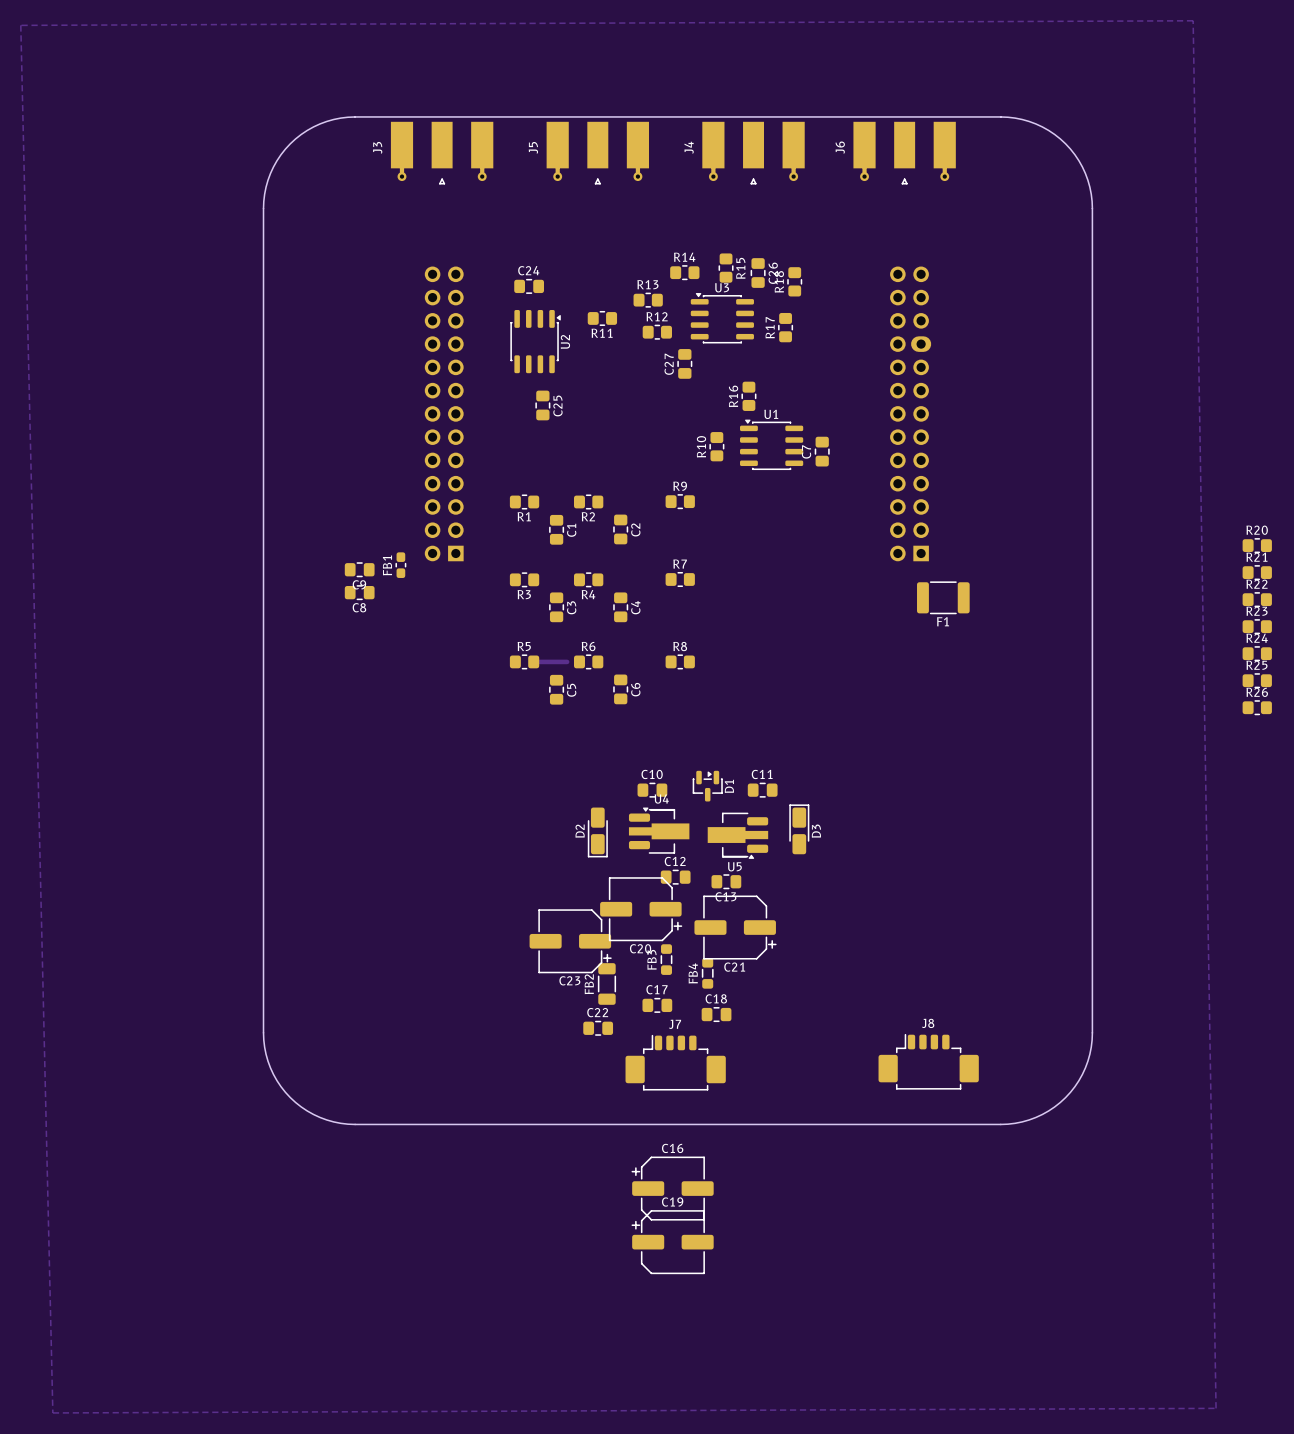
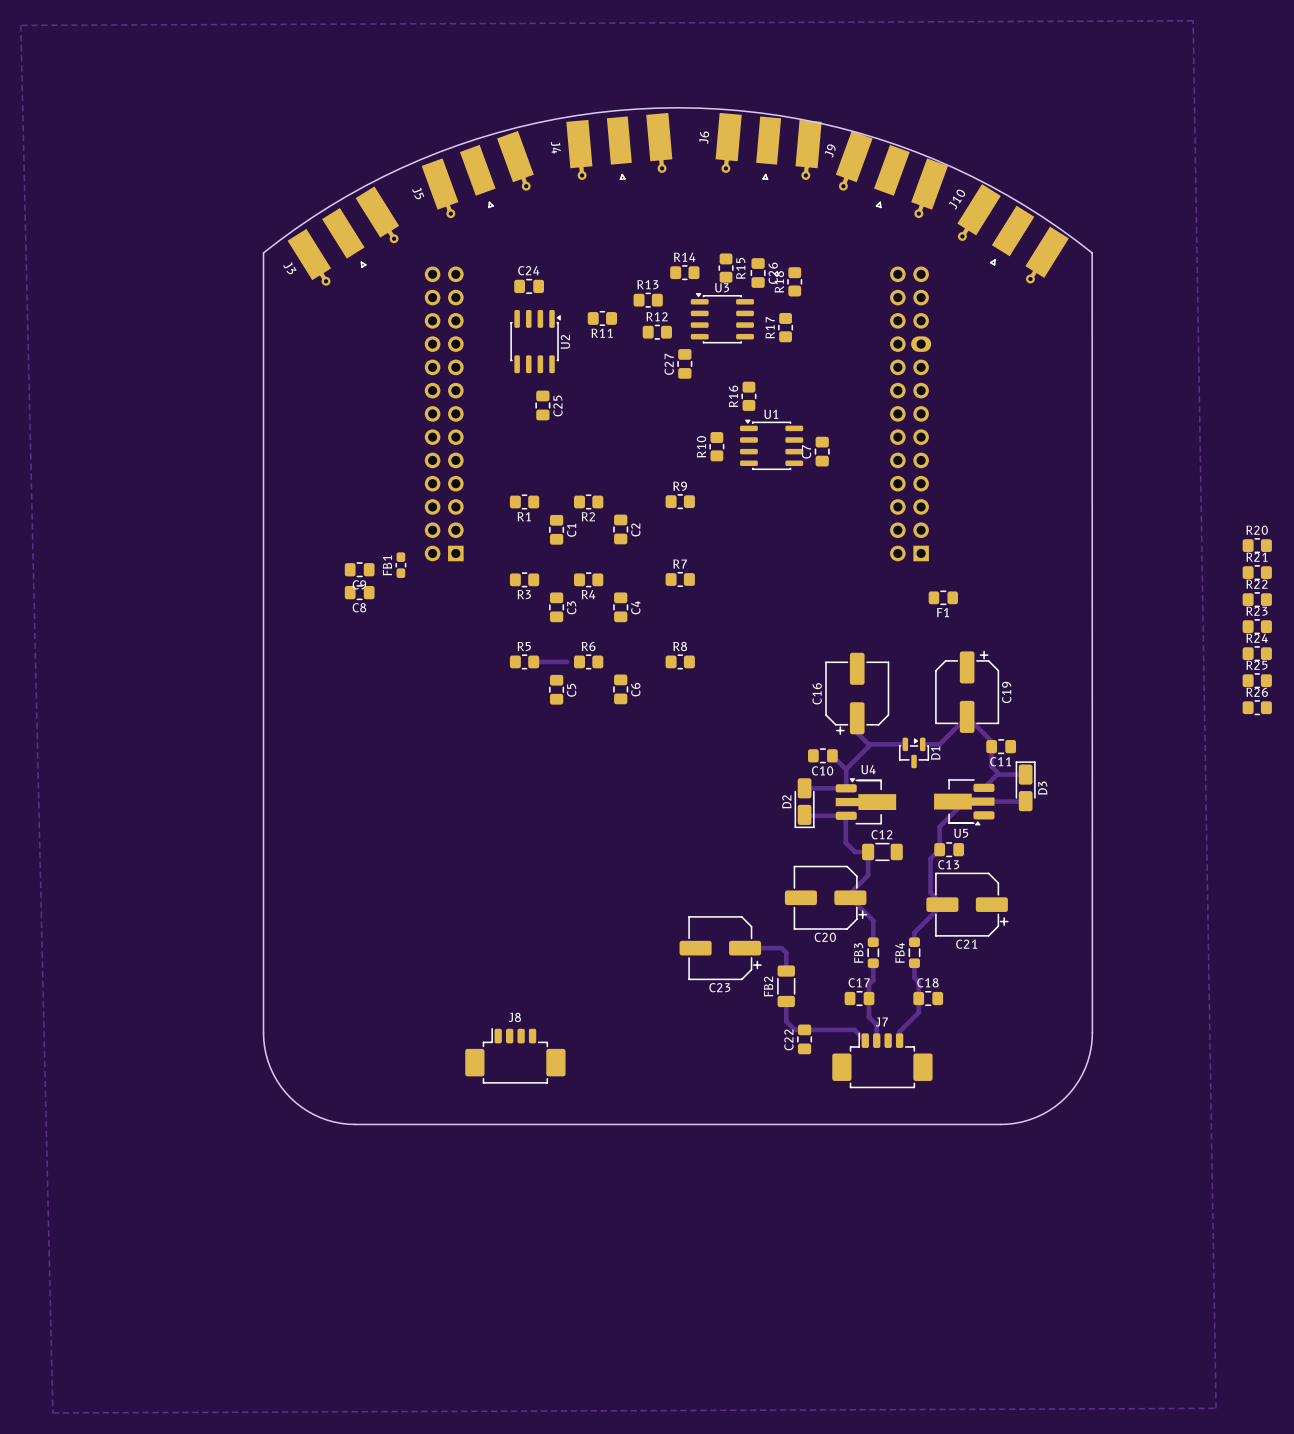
J3 rotation: 0° (442, 153) -> 32° counterclockwise (343, 236)
J3 position: (442, 153) -> (343, 236)
J5 rotation: 0° (597, 153) -> 20° counterclockwise (477, 174)
J5 position: (597, 153) -> (477, 174)
J4 rotation: 0° (753, 153) -> 5° counterclockwise (619, 146)
J4 position: (753, 153) -> (619, 146)
J6 rotation: 0° (904, 153) -> 5° clockwise (768, 146)
J6 position: (904, 153) -> (768, 146)
J9: none -> (891, 174)
J10: none -> (1013, 233)
board edge: (263, 252) (264, 194) (267, 180) (277, 160) (290, 143) (307, 130) (326, 121) (340, 118) (1000, 116) (1015, 118) (1035, 123) (1054, 134) (1065, 143) (1078, 160) (1085, 173) (1091, 194) (1092, 208) (1092, 1032) -> (263, 252) (312, 217) (347, 195) (401, 167) (458, 145) (516, 127) (576, 115) (616, 110) (677, 107) (738, 110) (799, 118) (858, 132) (897, 145) (935, 159) (990, 185) (1042, 217) (1092, 252) (1092, 1032)
F1 footprint: [917, 581, 970, 615] -> [928, 590, 958, 605]
track: none -> (857, 718) (857, 732) (868, 744) (905, 744)
track: none -> (870, 744) (846, 769) (846, 788) (804, 788)
track: none -> (922, 744) (939, 744) (967, 716) (991, 741) (991, 766) (997, 774)
track: none -> (832, 755) (846, 769)
C10 name position: C10 (652, 774) -> C10 (822, 770)
C11 name position: C11 (762, 774) -> C11 (1000, 761)
track: none -> (997, 774) (983, 787)
track: none -> (997, 774) (1025, 774)
D1 position: (707, 786) -> (914, 752)
C10 position: (652, 790) -> (822, 755)
C11 position: (762, 790) -> (1001, 746)
track: none -> (1025, 801) (964, 801) (939, 826) (939, 849) (930, 858) (930, 892) (942, 904) (914, 932) (914, 942)
track: none -> (804, 814) (846, 815) (845, 842) (854, 851) (868, 851) (868, 875) (850, 893) (850, 897) (873, 920) (873, 942)
D3 position: (799, 829) -> (1025, 786)
U4 position: (659, 830) -> (865, 801)
D2 position: (597, 832) -> (804, 803)
U5 position: (737, 835) -> (964, 802)
C12 footprint: [660, 869, 691, 885] -> [862, 843, 903, 861]
C20 footprint: [600, 877, 683, 942] -> [784, 865, 867, 930]
C13 position: (726, 881) -> (949, 849)
C21 position: (735, 927) -> (967, 904)
C23 position: (570, 941) -> (720, 948)
track: none -> (745, 948) (781, 948) (786, 952) (786, 971)
FB3 position: (666, 959) -> (873, 952)
track: none -> (873, 963) (873, 980) (869, 984) (868, 1016) (876, 1024) (876, 1040)
track: none -> (914, 963) (914, 977) (918, 982) (919, 1012) (899, 1031) (899, 1040)
FB4 position: (707, 973) -> (914, 952)
FB2 position: (606, 983) -> (786, 986)
track: none -> (786, 1001) (786, 1021) (794, 1029) (854, 1029) (865, 1040)
C17 position: (657, 1005) -> (859, 998)
C22 name position: C22 (597, 1012) -> C22 (788, 1039)
C18 position: (716, 1014) -> (928, 998)
C22 rotation: 0° (598, 1028) -> 90° clockwise (804, 1039)
C22 position: (598, 1028) -> (804, 1039)
J8 position: (928, 1061) -> (515, 1055)
J7 position: (675, 1062) -> (882, 1060)
C16 name position: C16 (672, 1148) -> C16 (817, 693)
C16 footprint: [631, 1156, 714, 1221] -> [825, 652, 890, 735]
C19 rotation: 0° (672, 1242) -> 90° clockwise (967, 691)
C19 position: (672, 1242) -> (967, 691)

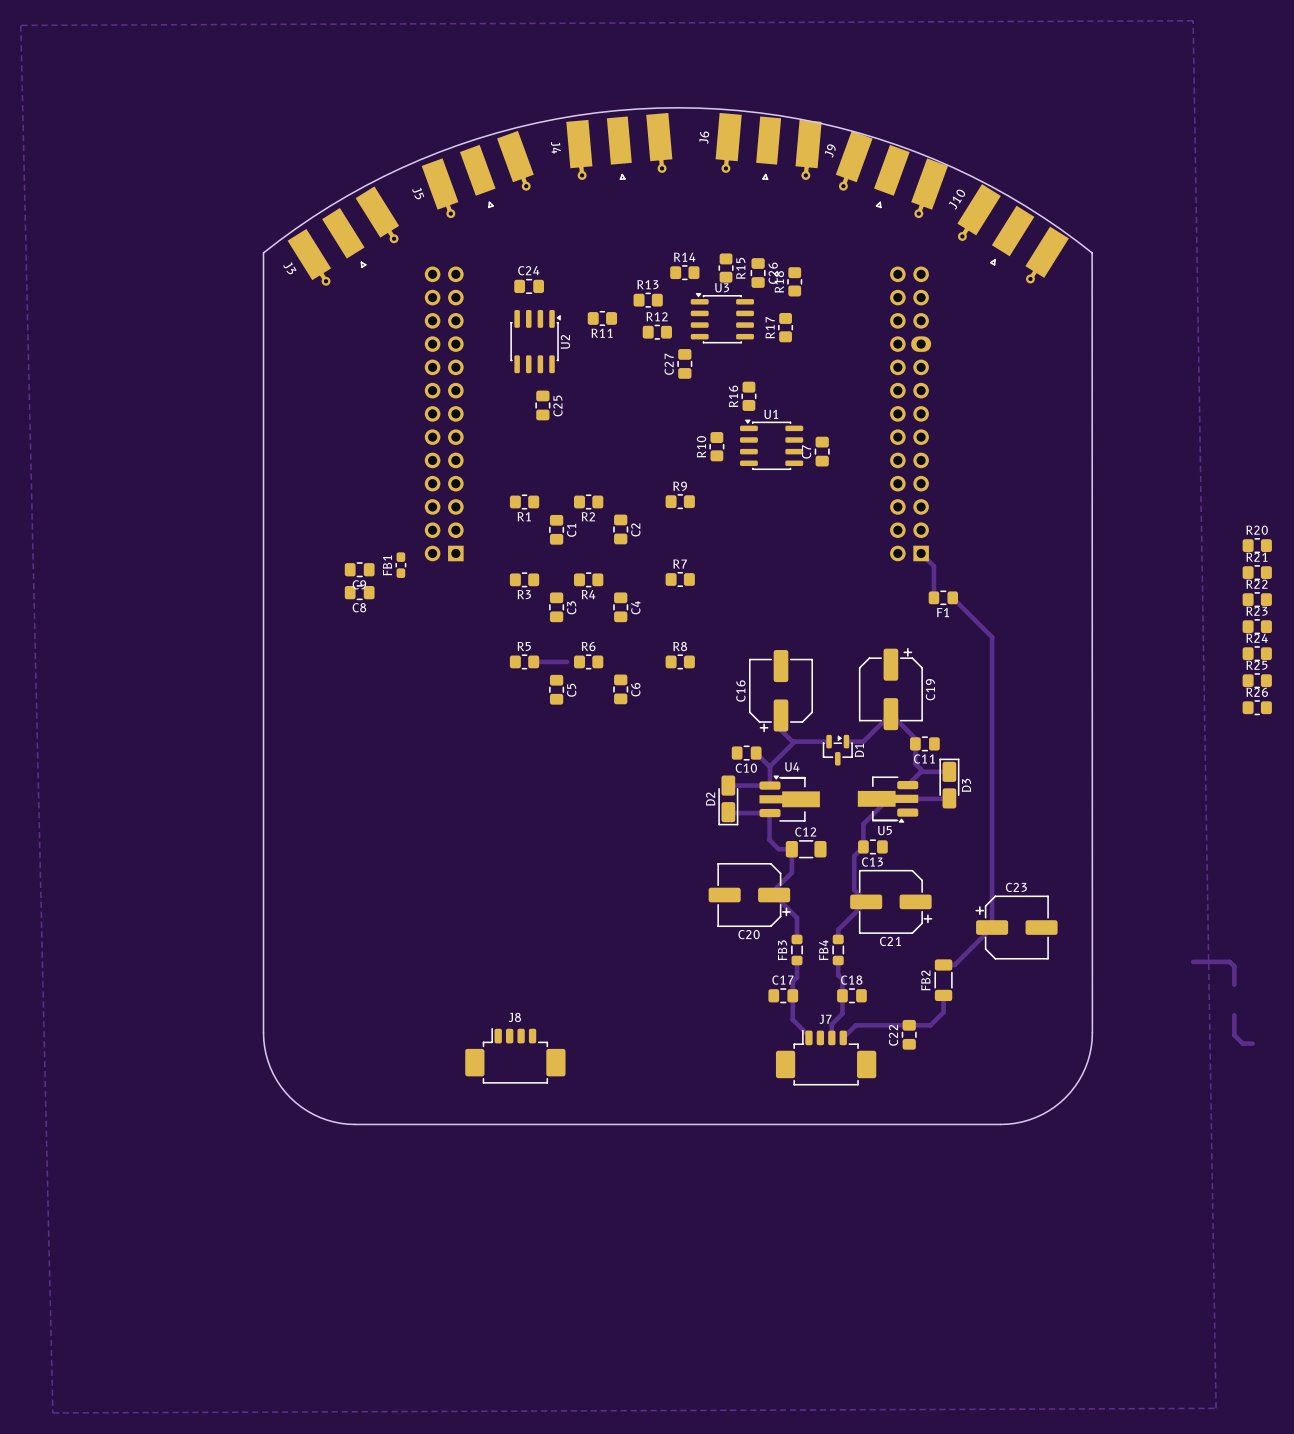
track: none -> (921, 553) (933, 566) (933, 597)
track: none -> (952, 597) (992, 637) (992, 927) (954, 964) (943, 964)
C16 footprint: [825, 652, 890, 735] -> [749, 650, 813, 732]
C19 position: (967, 691) -> (890, 689)
track: (857, 718) (857, 732) (868, 744) (905, 744) -> (780, 715) (780, 730) (792, 741) (829, 741)
track: (870, 744) (846, 769) (846, 788) (804, 788) -> (794, 741) (770, 766) (770, 785) (728, 785)
track: (922, 744) (939, 744) (967, 716) (991, 741) (991, 766) (997, 774) -> (846, 741) (863, 741) (890, 714) (915, 738) (915, 763) (921, 771)
C11 position: (1001, 746) -> (924, 743)
D1 position: (914, 752) -> (837, 750)
C10 position: (822, 755) -> (746, 753)
track: (832, 755) (846, 769) -> (756, 753) (770, 766)
track: (997, 774) (983, 787) -> (921, 771) (907, 785)
track: (997, 774) (1025, 774) -> (921, 771) (949, 771)
D3 position: (1025, 786) -> (949, 783)
U4 position: (865, 801) -> (789, 798)
track: (1025, 801) (964, 801) (939, 826) (939, 849) (930, 858) (930, 892) (942, 904) (914, 932) (914, 942) -> (949, 798) (888, 798) (863, 824) (863, 846) (854, 856) (854, 889) (866, 901) (838, 929) (838, 939)
U5 position: (964, 802) -> (888, 799)
D2 position: (804, 803) -> (728, 800)
track: (804, 814) (846, 815) (845, 842) (854, 851) (868, 851) (868, 875) (850, 893) (850, 897) (873, 920) (873, 942) -> (728, 812) (770, 813) (769, 840) (778, 849) (791, 849) (791, 872) (774, 890) (774, 895) (797, 917) (797, 939)
C13 position: (949, 849) -> (872, 846)
C12 position: (882, 851) -> (806, 849)
C20 footprint: [784, 865, 867, 930] -> [708, 863, 791, 927]
C21 position: (967, 904) -> (891, 901)
C23 footprint: [679, 916, 762, 980] -> [975, 895, 1058, 960]
track: (745, 948) (781, 948) (786, 952) (786, 971) -> none
FB3 position: (873, 952) -> (797, 949)
FB4 position: (914, 952) -> (838, 949)
track: none -> (797, 960) (797, 977) (792, 981) (792, 1019) (808, 1037)
track: none -> (838, 960) (838, 975) (842, 979) (842, 1013) (831, 1024) (831, 1037)
track: none -> (1193, 961) (1229, 961) (1234, 966) (1234, 984)
track: (873, 963) (873, 980) (869, 984) (868, 1016) (876, 1024) (876, 1040) -> none
track: (914, 963) (914, 977) (918, 982) (919, 1012) (899, 1031) (899, 1040) -> none
FB2 position: (786, 986) -> (943, 980)
C23 name position: C23 (719, 987) -> C23 (1016, 887)
track: none -> (943, 995) (943, 1012) (930, 1025) (855, 1025) (843, 1037)
C17 position: (859, 998) -> (783, 995)
C18 position: (928, 998) -> (851, 995)
track: (786, 1001) (786, 1021) (794, 1029) (854, 1029) (865, 1040) -> none
track: none -> (1234, 1015) (1234, 1035) (1242, 1043) (1252, 1043)
C22 position: (804, 1039) -> (909, 1034)
J7 position: (882, 1060) -> (826, 1057)

